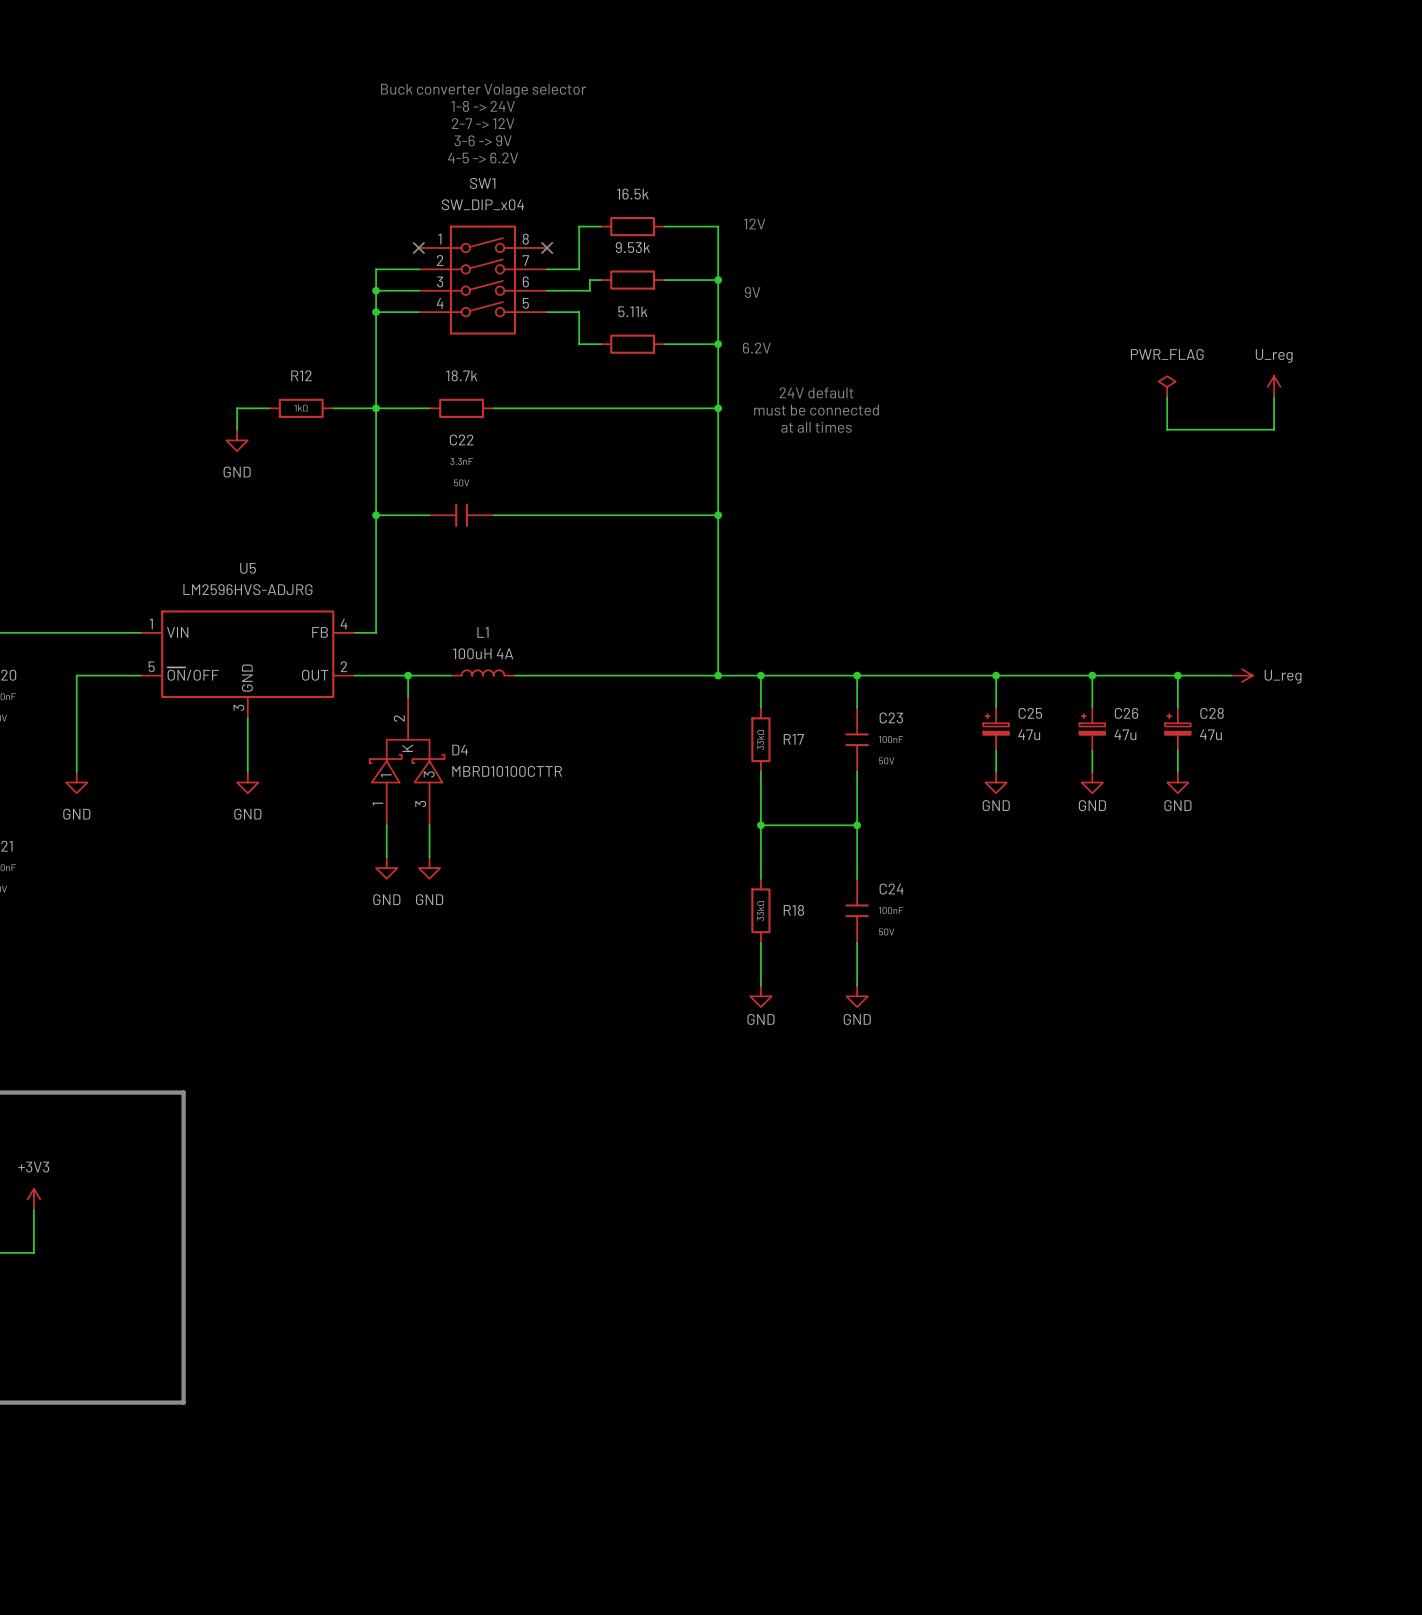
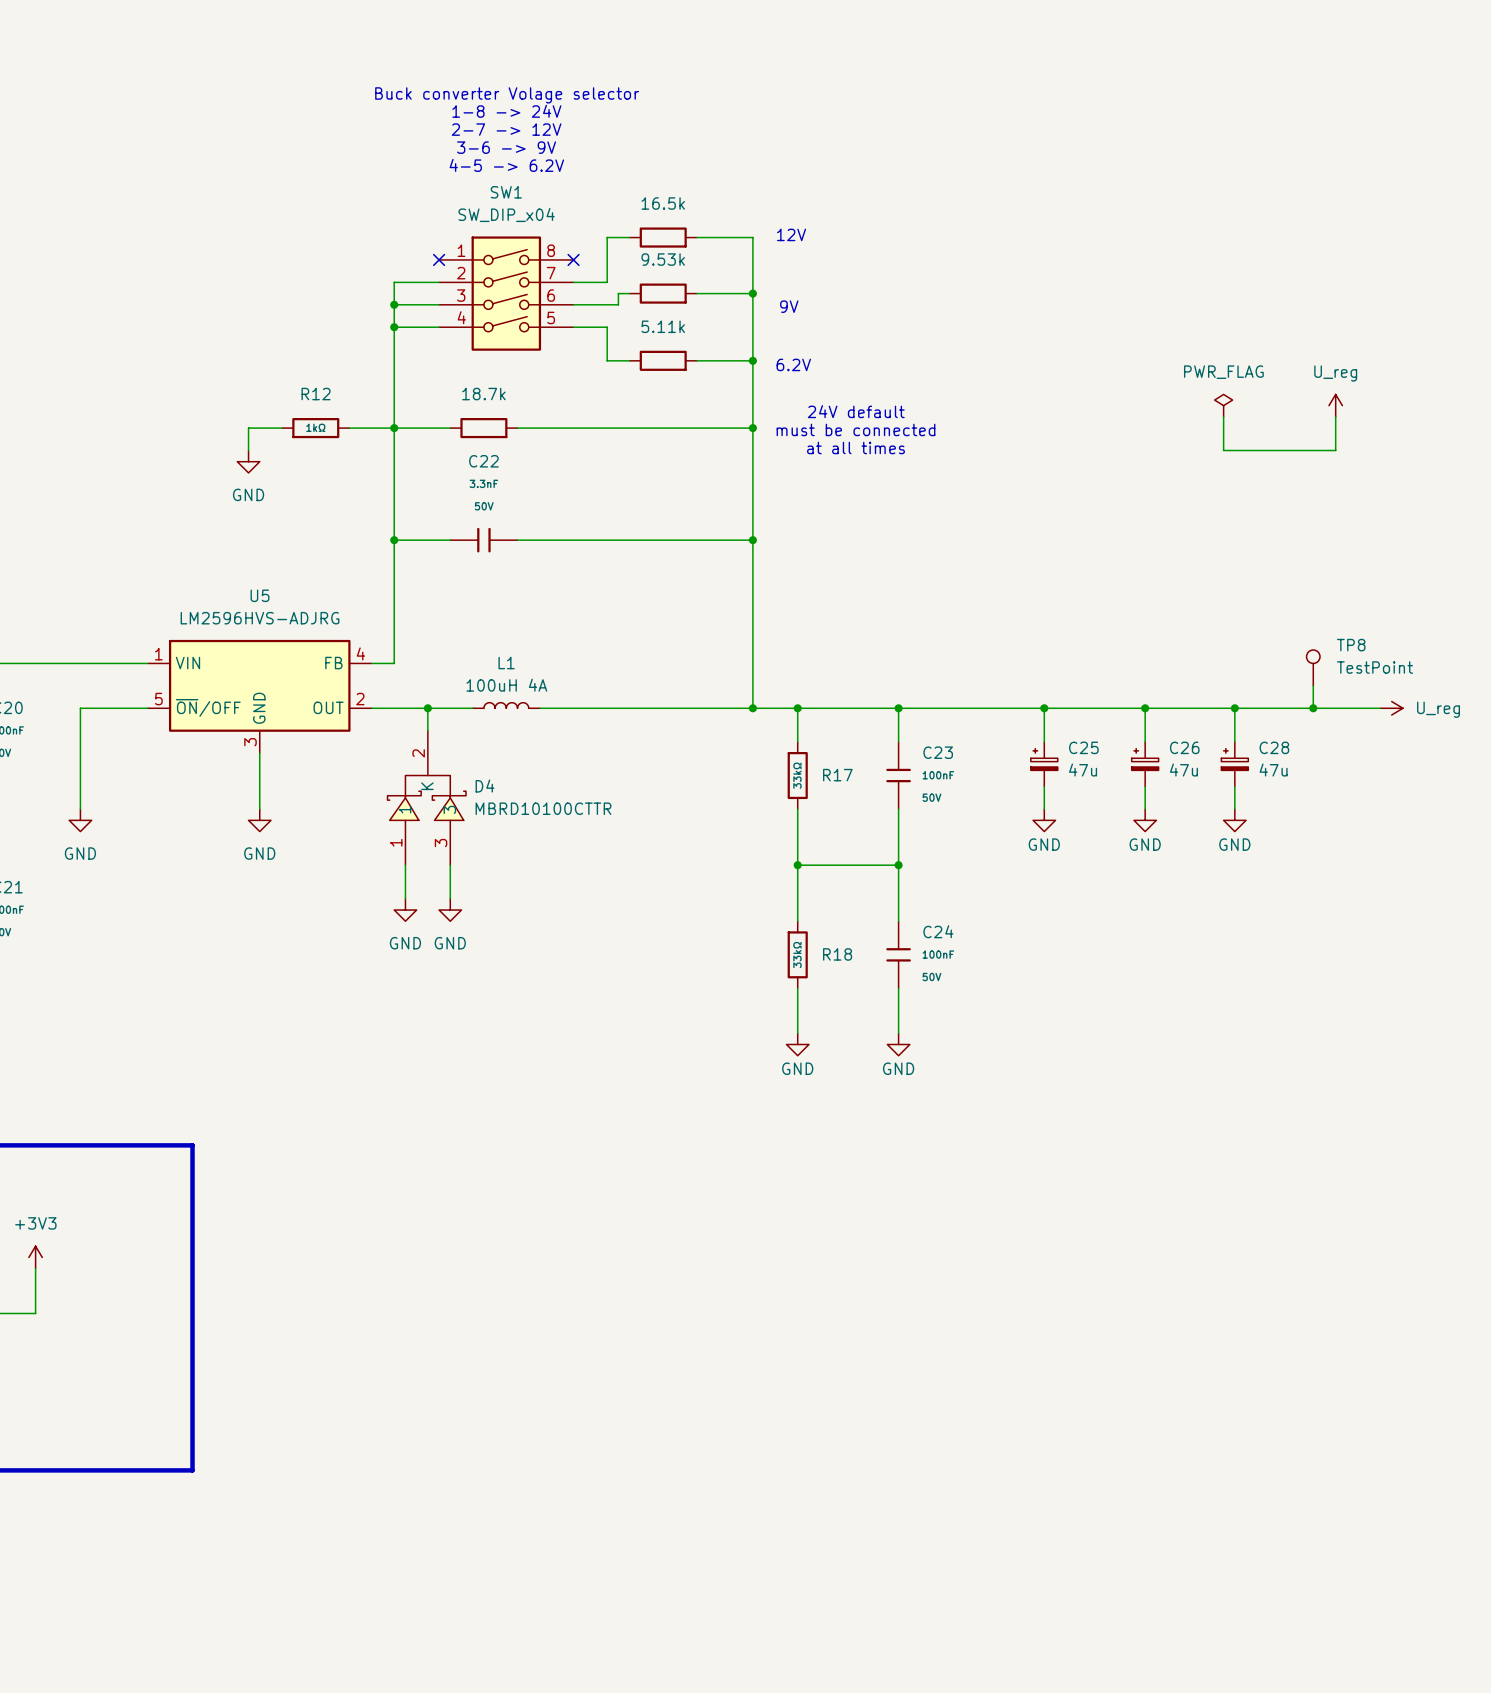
TP8: none -> TestPoint (1313, 667)
wire: none -> (1313, 685) (1313, 708)
wire: none -> (1290, 708) (1380, 708)
power symbol position: U_reg (1242, 675) -> U_reg (1391, 708)
junction: none -> (1313, 708)

